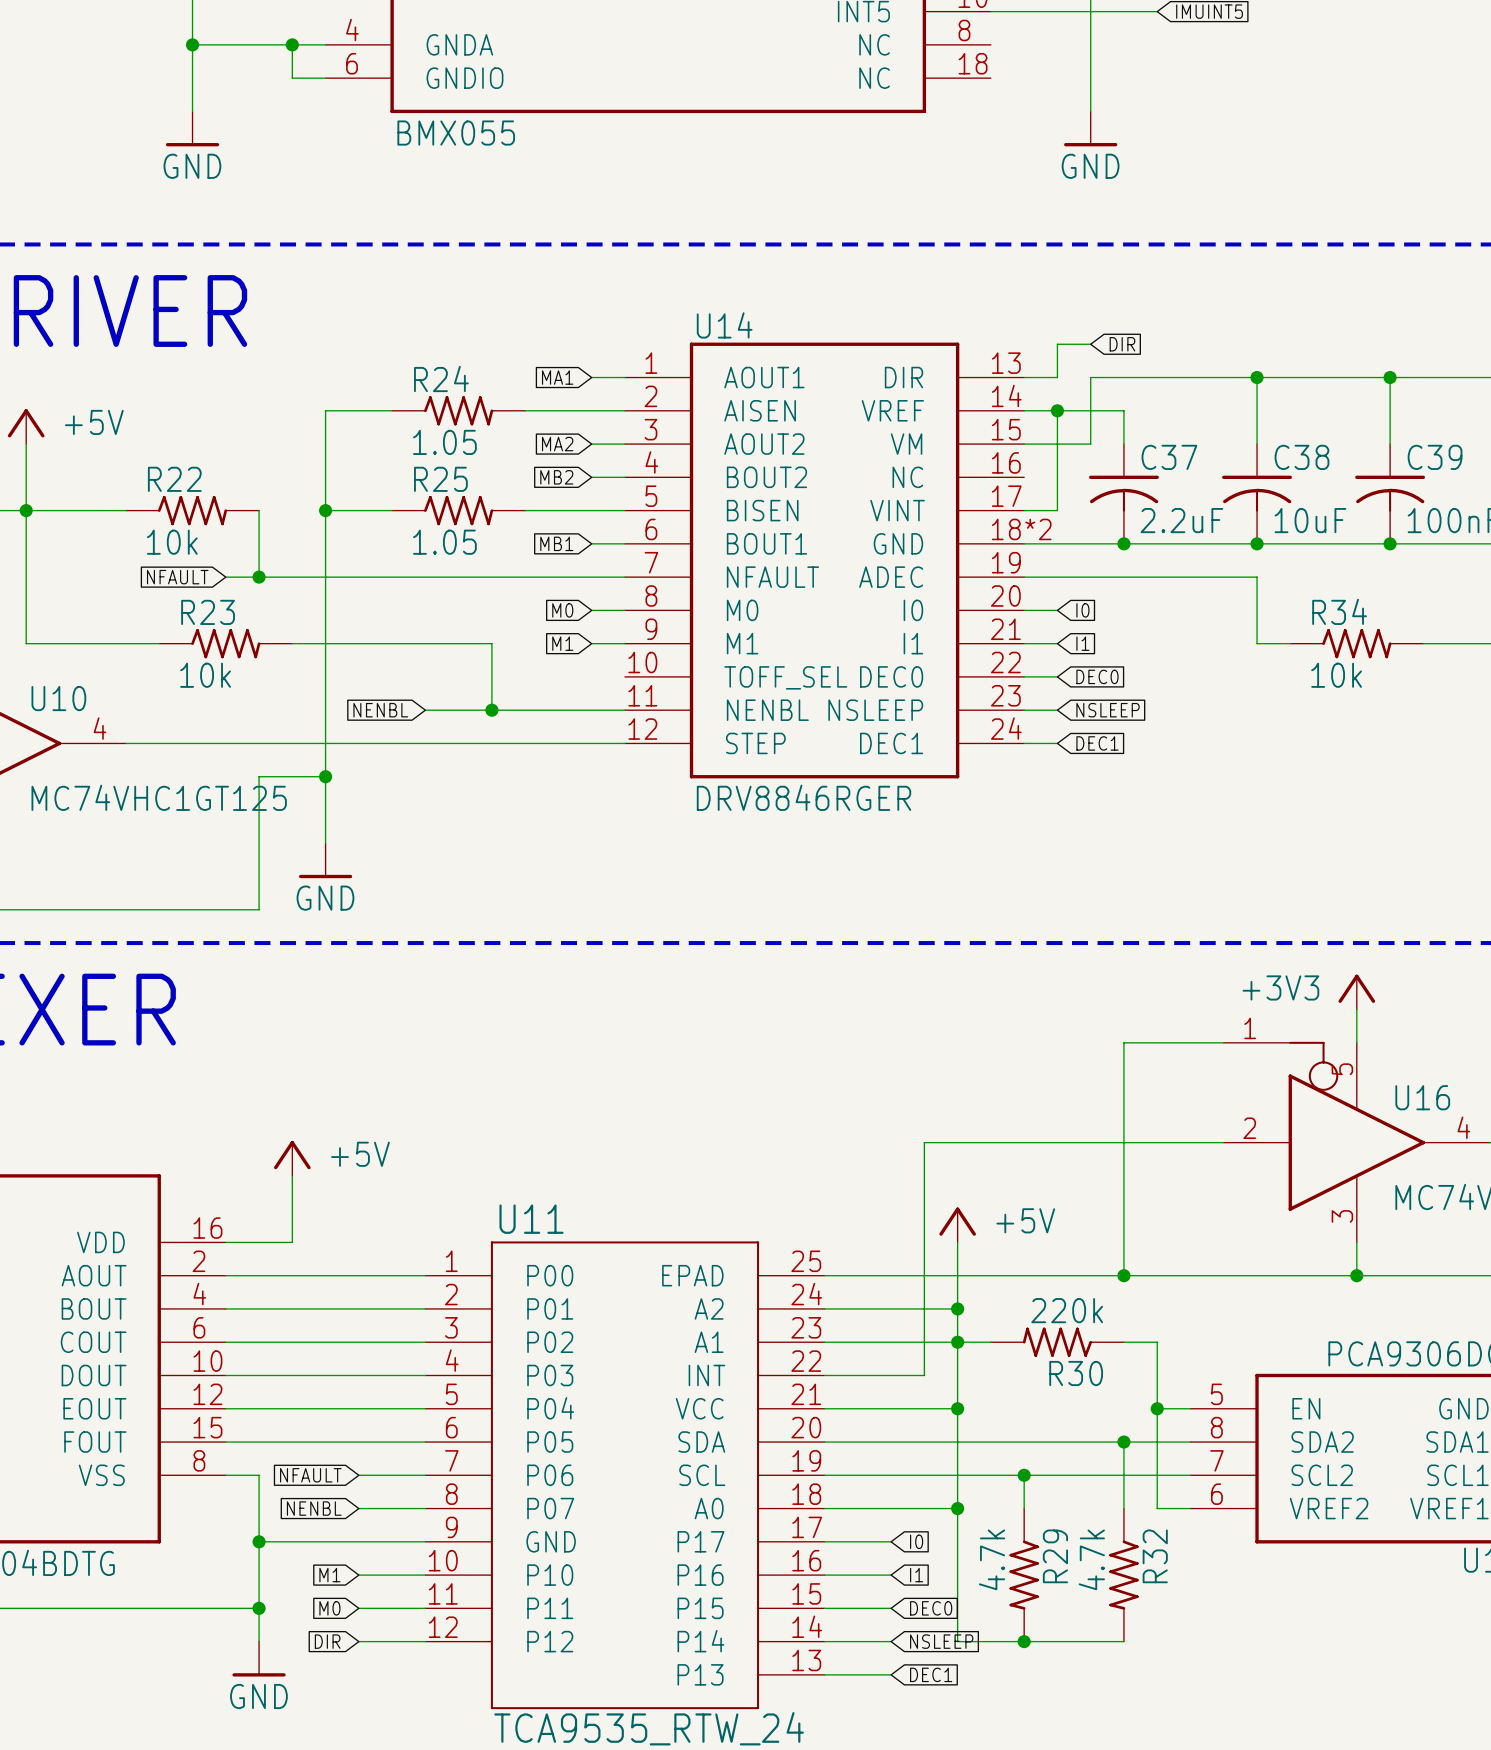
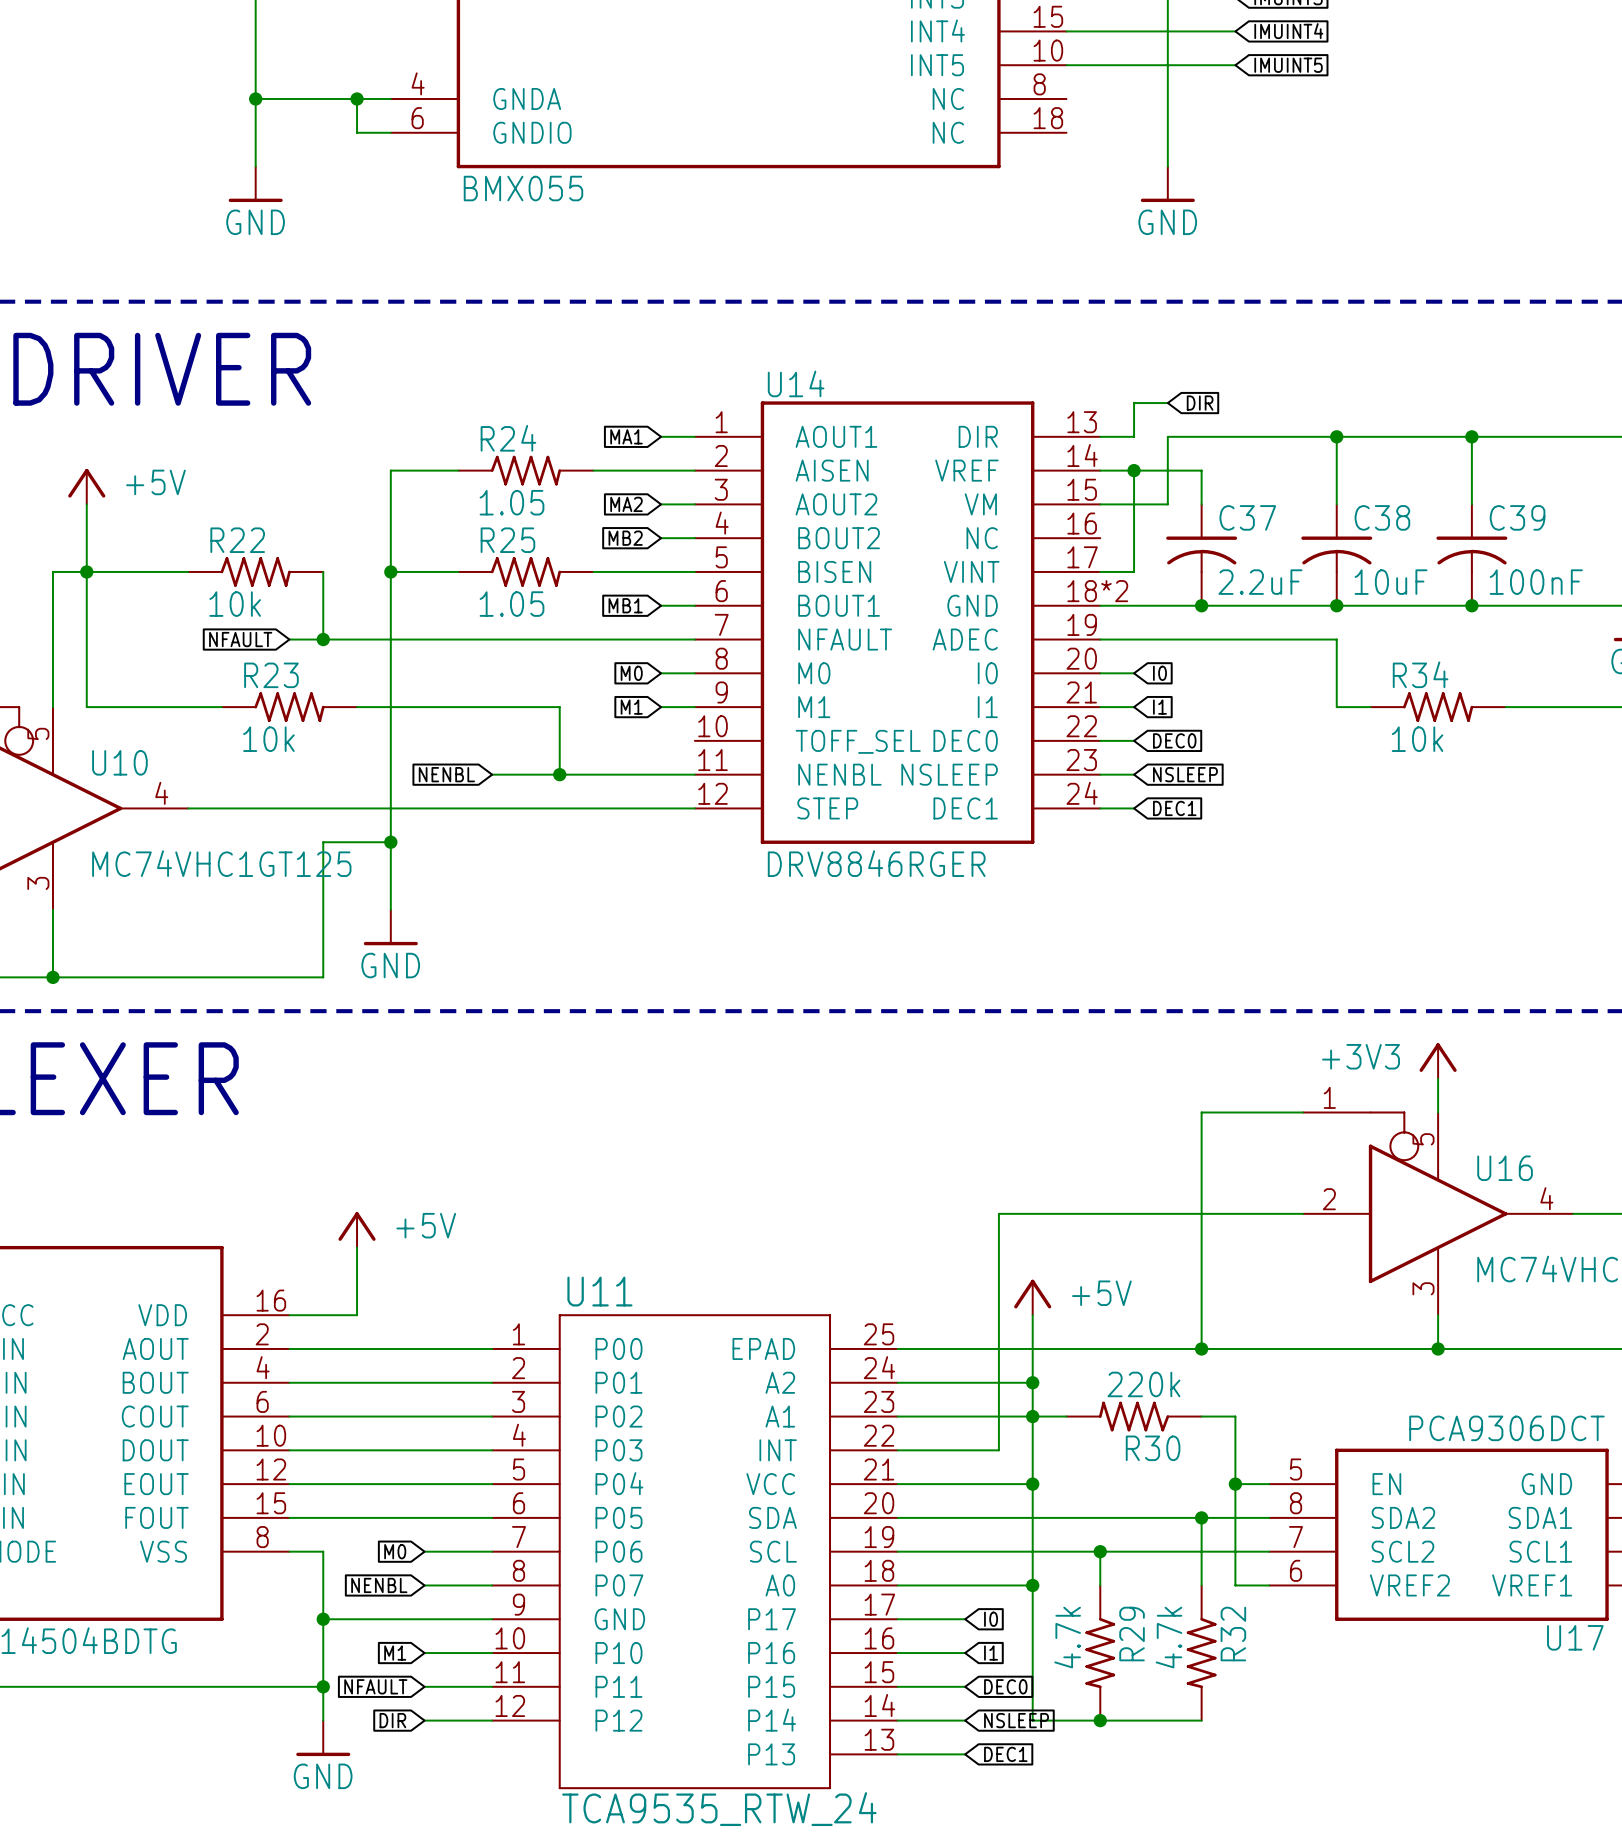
global label: NFAULT (310, 1475) -> M0 (395, 1551)
global label: M0 (329, 1608) -> NFAULT (375, 1686)

